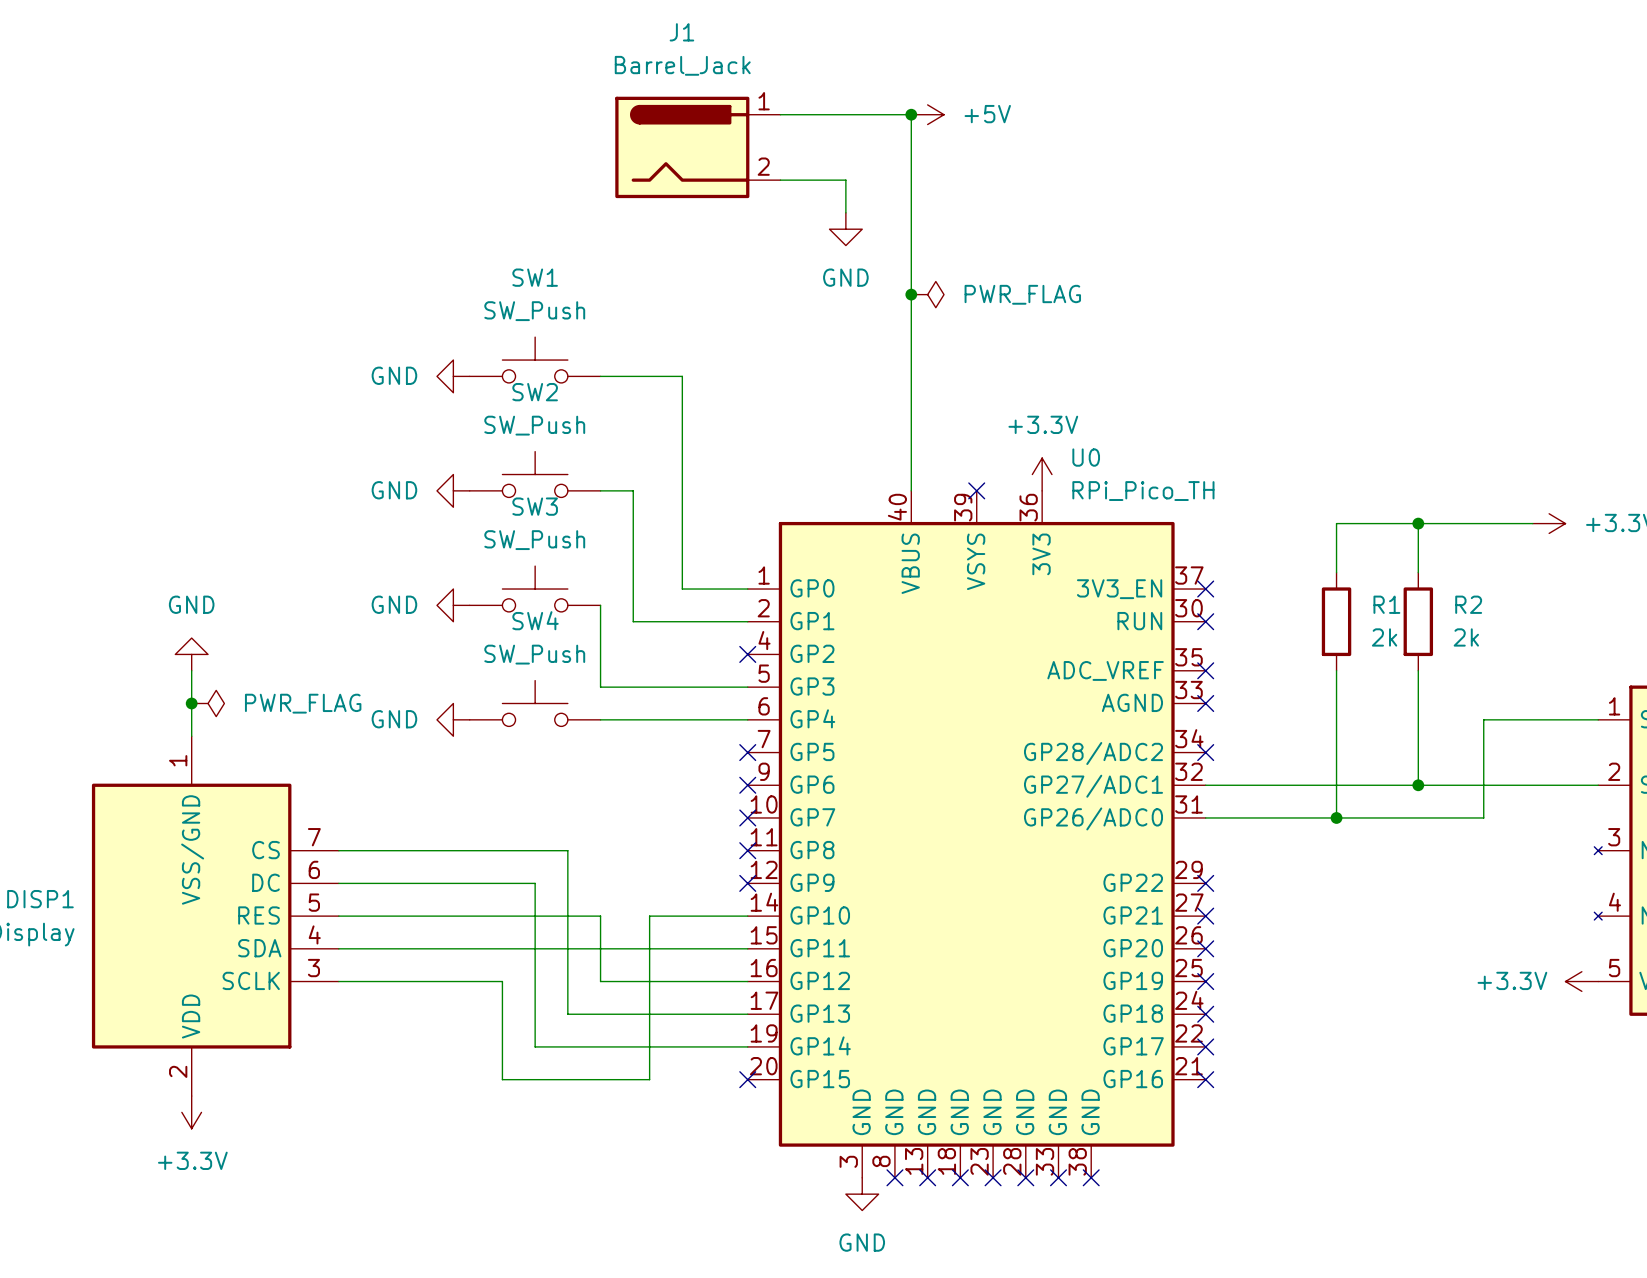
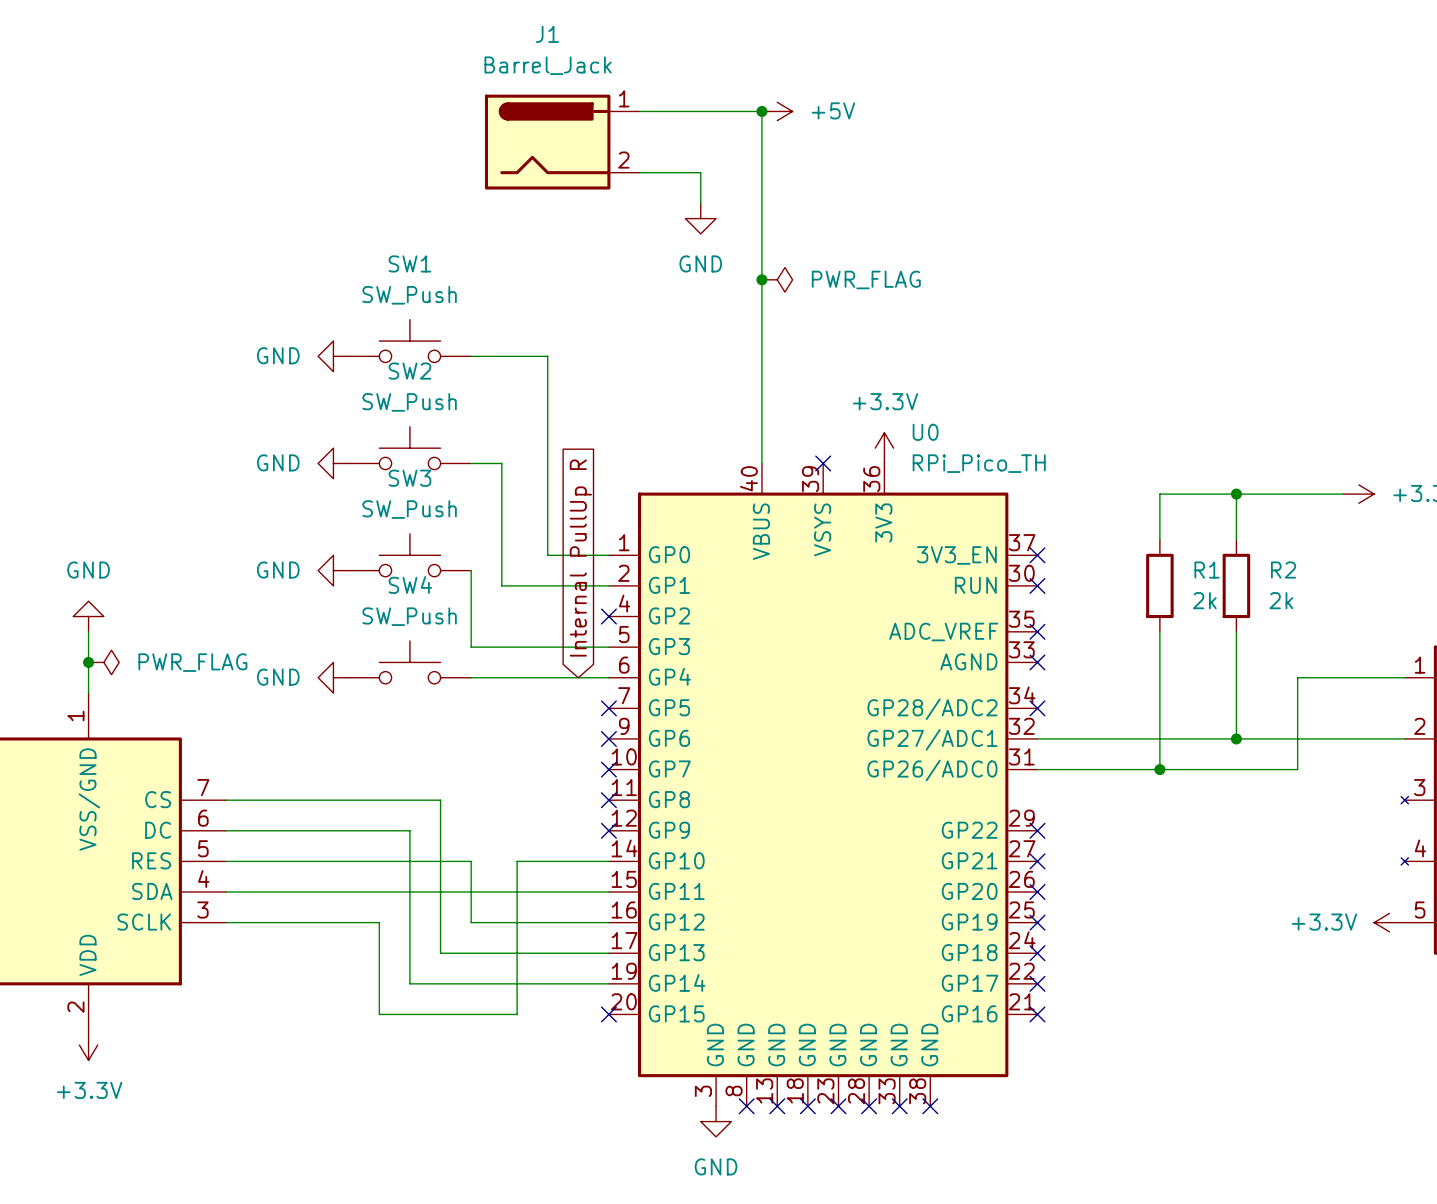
global label: none -> Internal PullUp R (580, 558)

